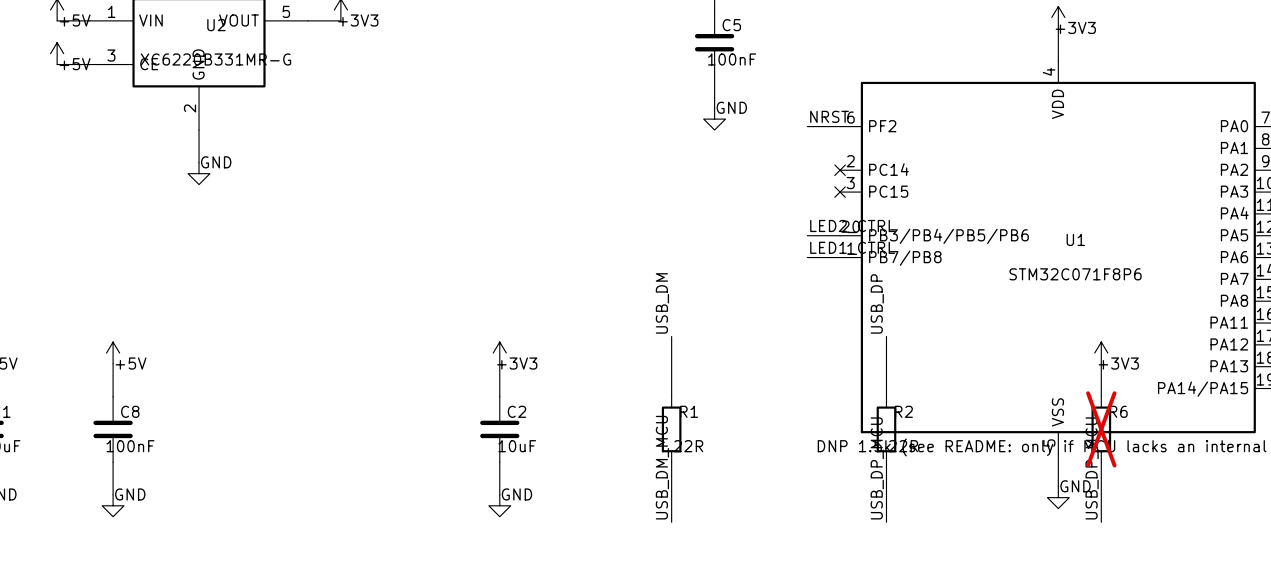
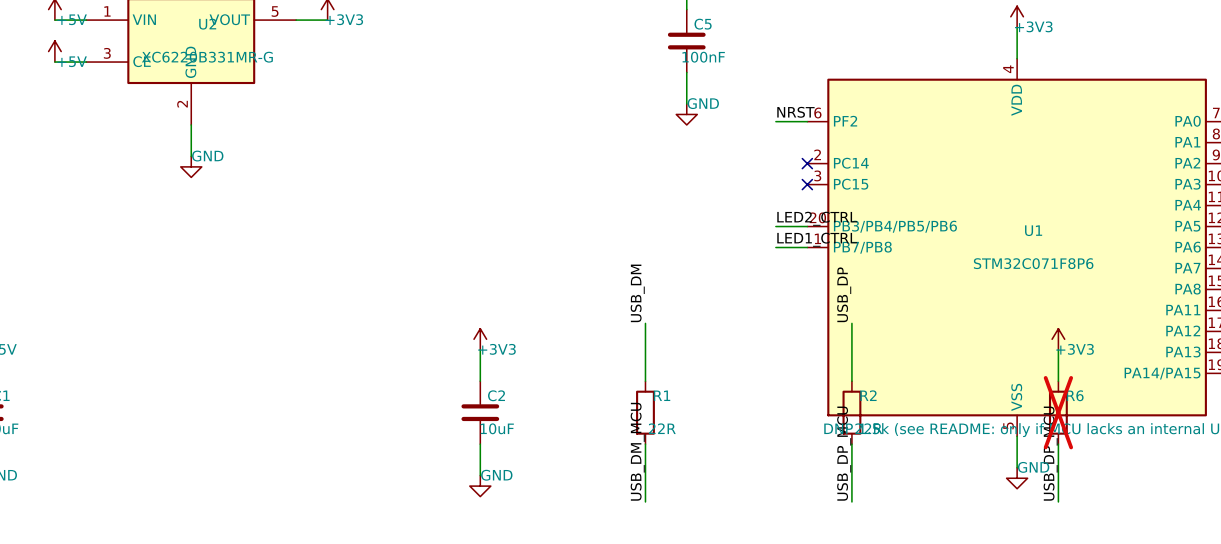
power symbol: +5V (113, 353) -> none
wire: (113, 363) (113, 396) -> none
C8: 100nF (113, 429) -> none
wire: (113, 462) (113, 494) -> none
power symbol: GND (113, 505) -> none

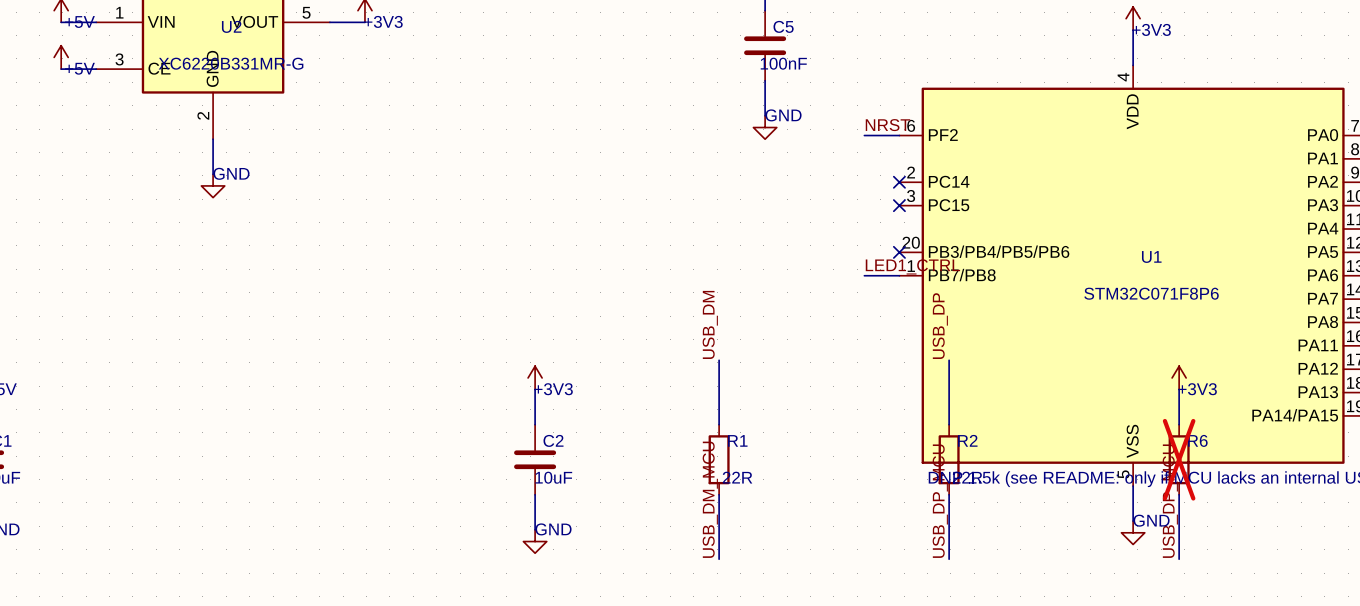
label: LED2_CTRL (817, 218) -> none
wire: (775, 226) (807, 226) -> none
no-connect mark: none -> (899, 252)

